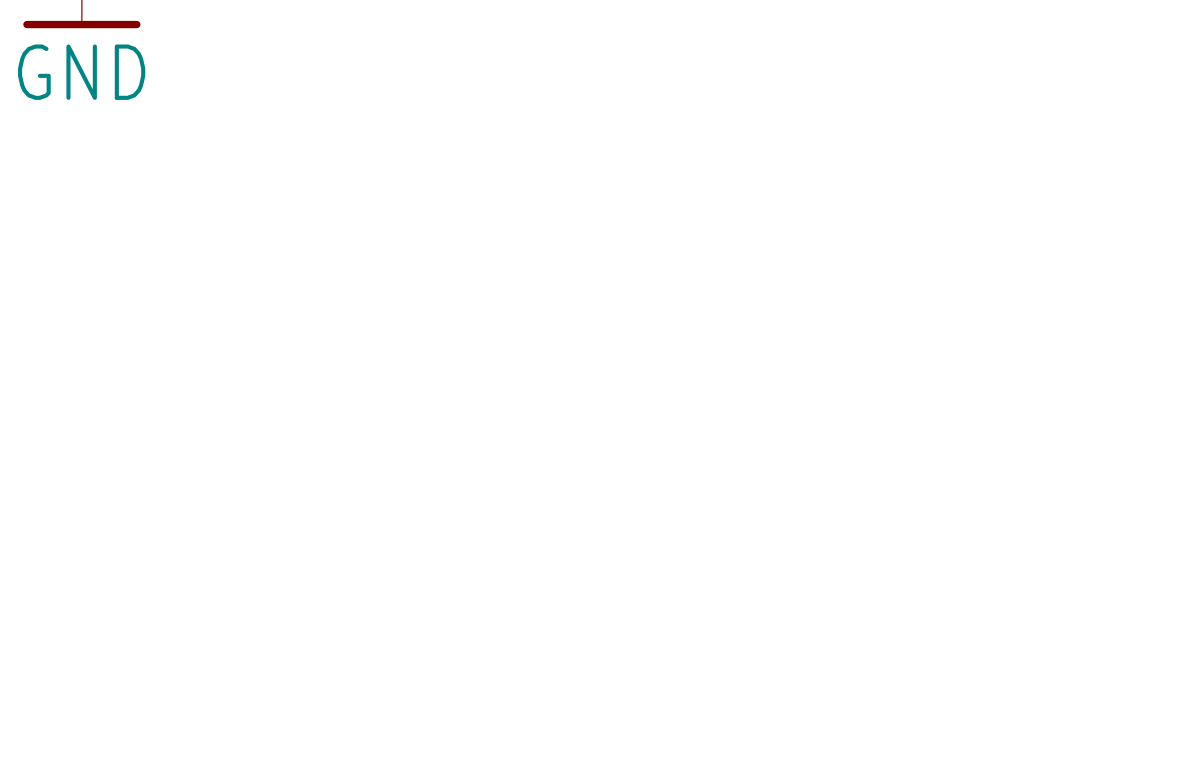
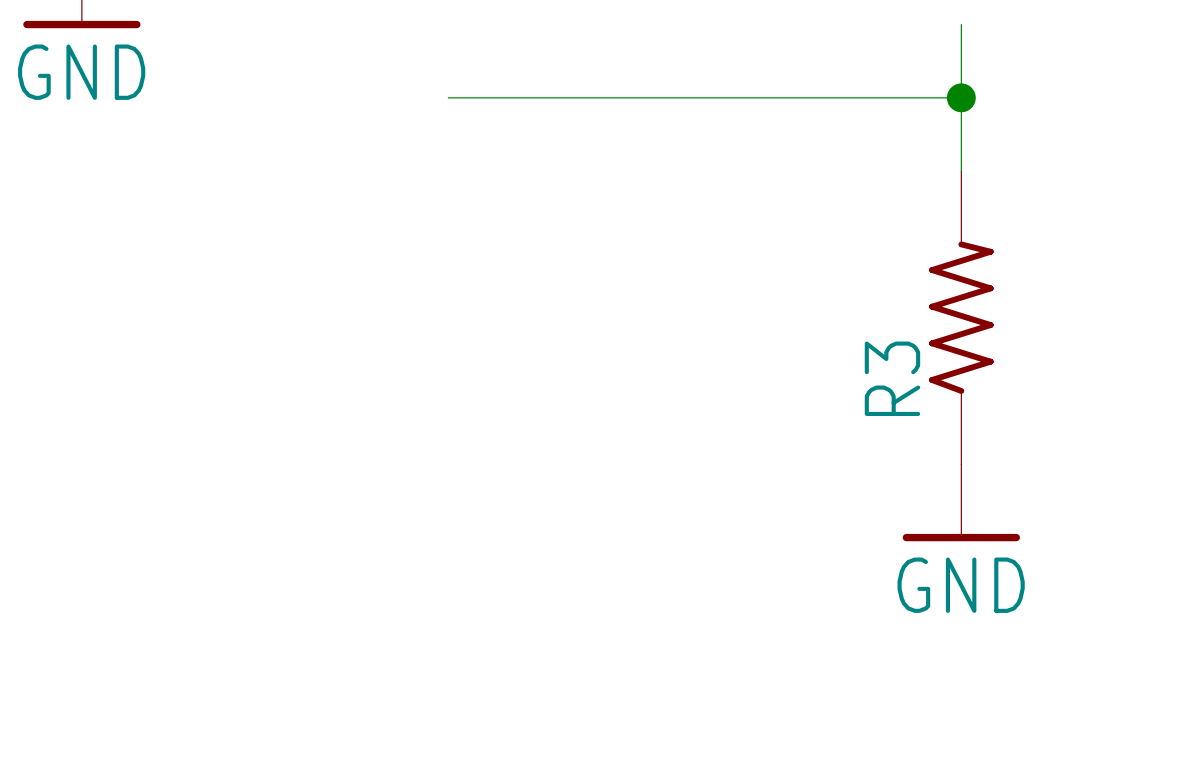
wire: none -> (961, 24) (961, 171)
wire: none -> (448, 97) (961, 97)
junction: none -> (961, 97)
R3: none -> (961, 317)
power symbol: none -> GND (961, 502)

